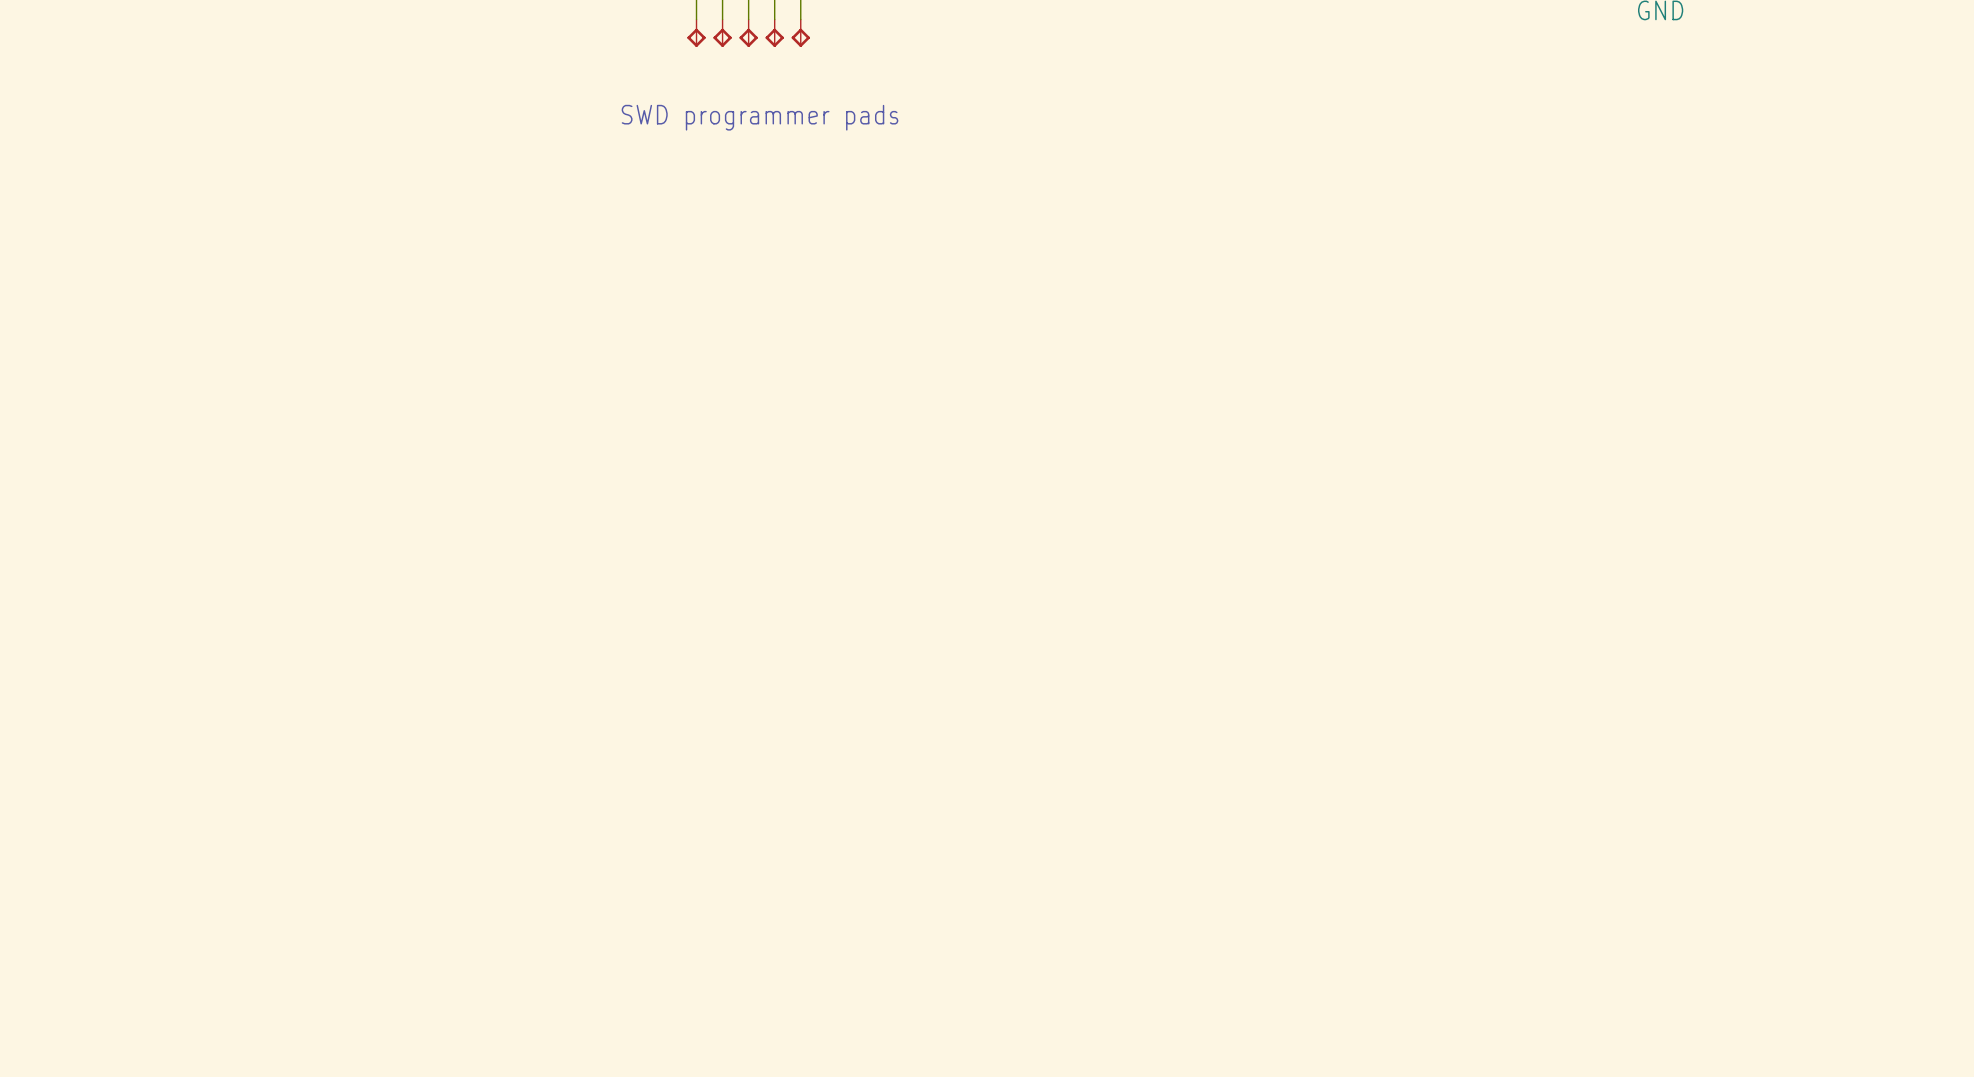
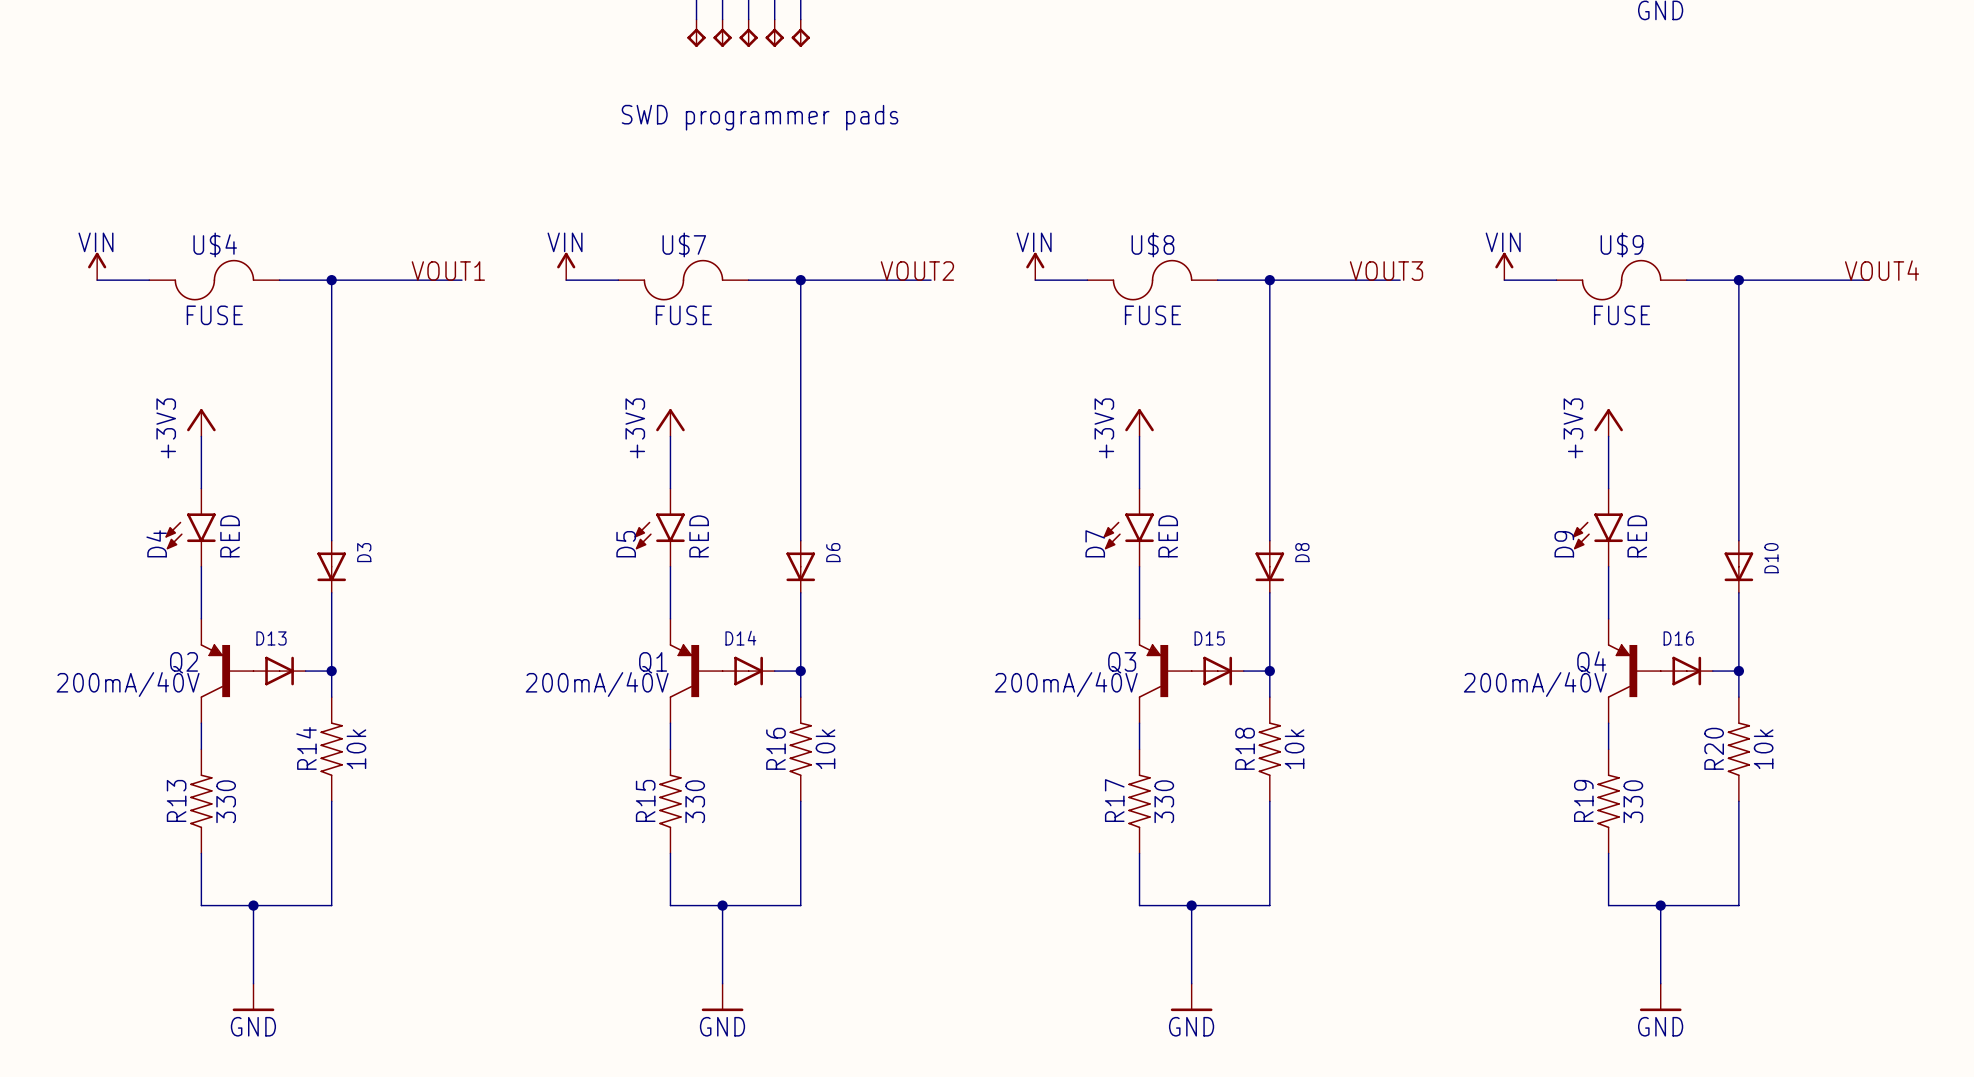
power symbol: none -> VIN (97, 266)
power symbol: none -> VIN (566, 266)
power symbol: none -> VIN (1035, 266)
power symbol: none -> VIN (1504, 266)
label: none -> VOUT4 (1882, 270)
label: none -> VOUT1 (448, 271)
label: none -> VOUT2 (917, 271)
label: none -> VOUT3 (1386, 271)
wire: none -> (97, 280) (149, 280)
U$4: none -> FUSE (214, 280)
wire: none -> (279, 280) (461, 280)
wire: none -> (331, 280) (331, 540)
junction: none -> (331, 280)
wire: none -> (566, 280) (618, 280)
U$7: none -> FUSE (683, 280)
wire: none -> (748, 280) (931, 280)
wire: none -> (800, 280) (800, 540)
junction: none -> (800, 280)
wire: none -> (1035, 280) (1087, 280)
U$8: none -> FUSE (1152, 280)
wire: none -> (1217, 280) (1400, 280)
wire: none -> (1269, 280) (1269, 540)
junction: none -> (1269, 280)
wire: none -> (1504, 280) (1556, 280)
U$9: none -> FUSE (1621, 280)
wire: none -> (1686, 280) (1869, 280)
wire: none -> (1738, 280) (1738, 540)
junction: none -> (1738, 280)
power symbol: none -> +3V3 (201, 422)
power symbol: none -> +3V3 (670, 422)
power symbol: none -> +3V3 (1139, 422)
power symbol: none -> +3V3 (1608, 422)
wire: none -> (201, 436) (201, 488)
wire: none -> (670, 436) (670, 488)
wire: none -> (1139, 436) (1139, 488)
wire: none -> (1608, 436) (1608, 488)
D4: none -> RED (190, 527)
D5: none -> RED (659, 527)
D7: none -> RED (1128, 527)
D9: none -> RED (1597, 527)
wire: none -> (201, 566) (201, 618)
D3: none -> (331, 566)
wire: none -> (670, 566) (670, 618)
D6: none -> (800, 566)
wire: none -> (1139, 566) (1139, 618)
D8: none -> (1269, 566)
wire: none -> (1608, 566) (1608, 618)
D10: none -> (1738, 566)
wire: none -> (331, 592) (331, 697)
wire: none -> (800, 592) (800, 697)
wire: none -> (1269, 592) (1269, 697)
wire: none -> (1738, 592) (1738, 697)
Q2: none -> 200mA/40V (227, 671)
D13: none -> (279, 671)
wire: none -> (305, 671) (331, 671)
junction: none -> (331, 671)
Q1: none -> 200mA/40V (696, 671)
D14: none -> (748, 671)
wire: none -> (774, 671) (800, 671)
junction: none -> (800, 671)
Q3: none -> 200mA/40V (1165, 671)
D15: none -> (1217, 671)
wire: none -> (1243, 671) (1269, 671)
junction: none -> (1269, 671)
Q4: none -> 200mA/40V (1634, 671)
D16: none -> (1686, 671)
wire: none -> (1712, 671) (1738, 671)
junction: none -> (1738, 671)
wire: none -> (201, 723) (201, 749)
wire: none -> (670, 723) (670, 749)
wire: none -> (1139, 723) (1139, 749)
wire: none -> (1608, 723) (1608, 749)
R14: none -> 10k (331, 749)
R16: none -> 10k (800, 749)
R18: none -> 10k (1269, 749)
R20: none -> 10k (1738, 749)
R13: none -> 330 (201, 801)
wire: none -> (331, 801) (331, 905) (201, 905) (201, 853)
R15: none -> 330 (670, 801)
wire: none -> (800, 801) (800, 905) (670, 905) (670, 853)
R17: none -> 330 (1139, 801)
wire: none -> (1269, 801) (1269, 905) (1139, 905) (1139, 853)
R19: none -> 330 (1608, 801)
wire: none -> (1738, 801) (1738, 905) (1608, 905) (1608, 853)
wire: none -> (253, 905) (253, 983)
junction: none -> (253, 905)
wire: none -> (722, 905) (722, 983)
junction: none -> (722, 905)
wire: none -> (1191, 905) (1191, 983)
junction: none -> (1191, 905)
wire: none -> (1660, 905) (1660, 983)
junction: none -> (1660, 905)
power symbol: none -> GND (253, 997)
power symbol: none -> GND (722, 997)
power symbol: none -> GND (1191, 997)
power symbol: none -> GND (1660, 997)

